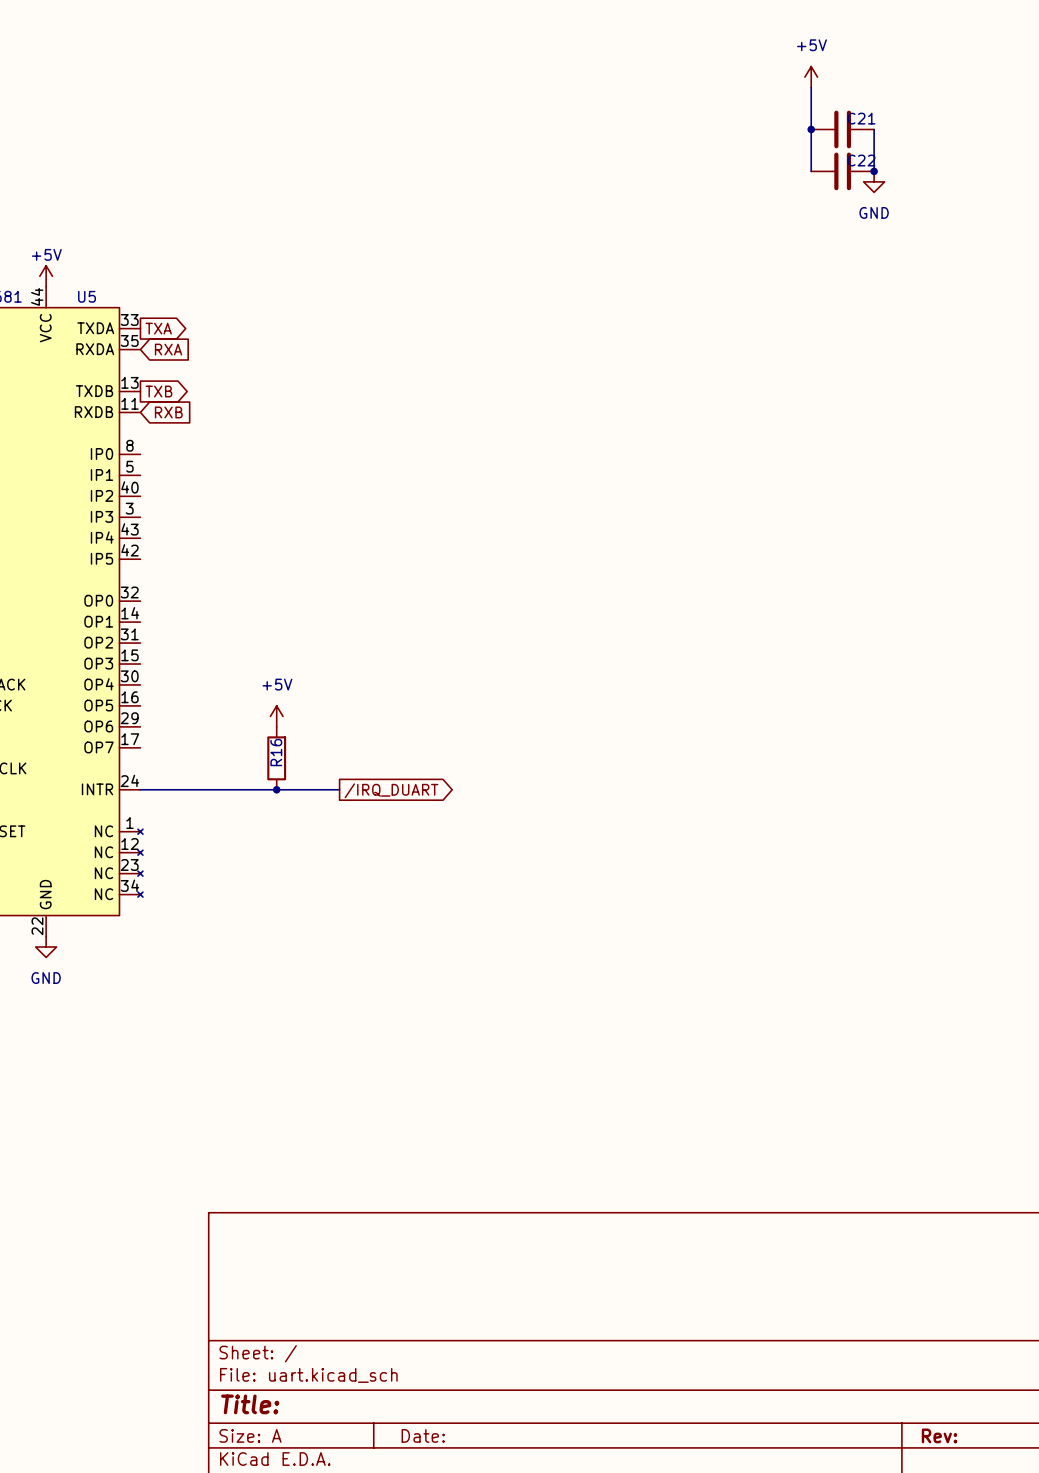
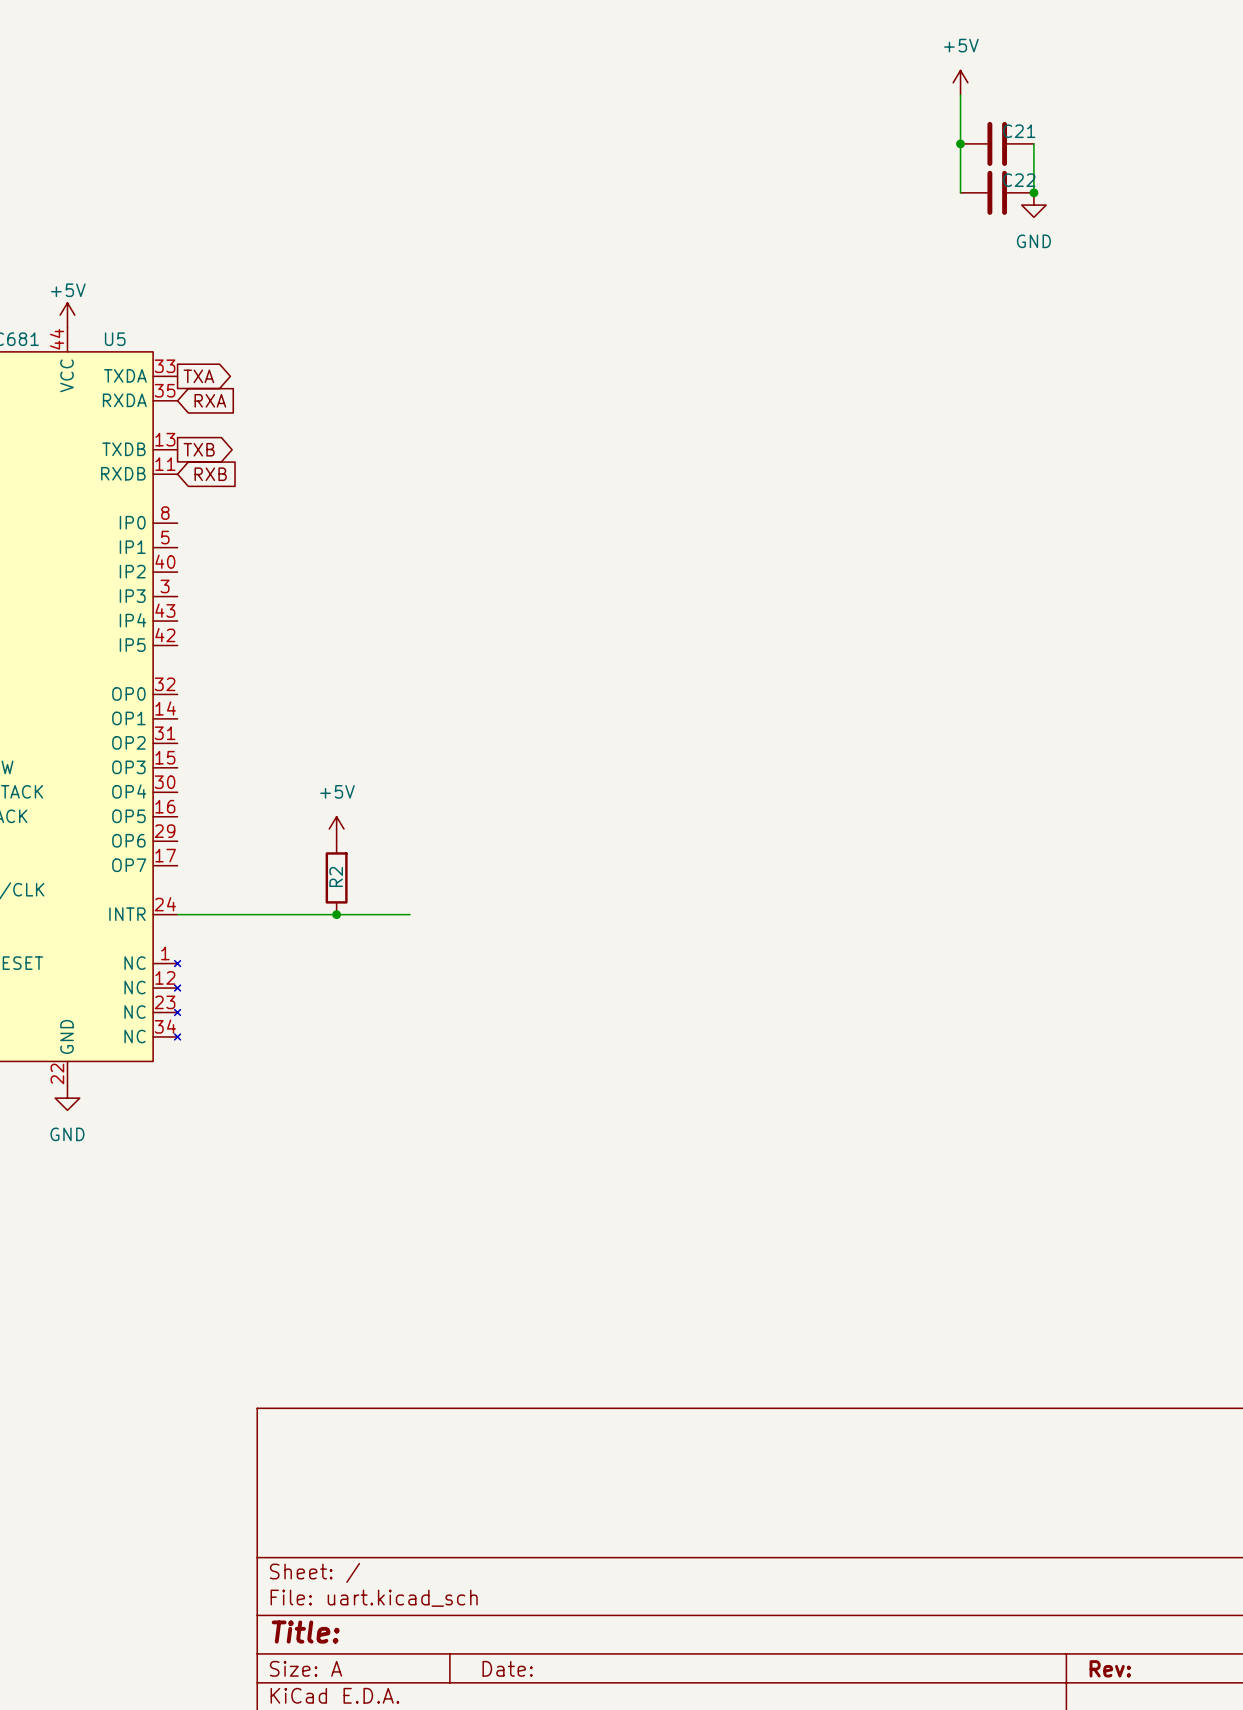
R16 name: R16 (276, 752) -> R2 (336, 876)
global label: /IRQ_DUART (391, 790) -> none

